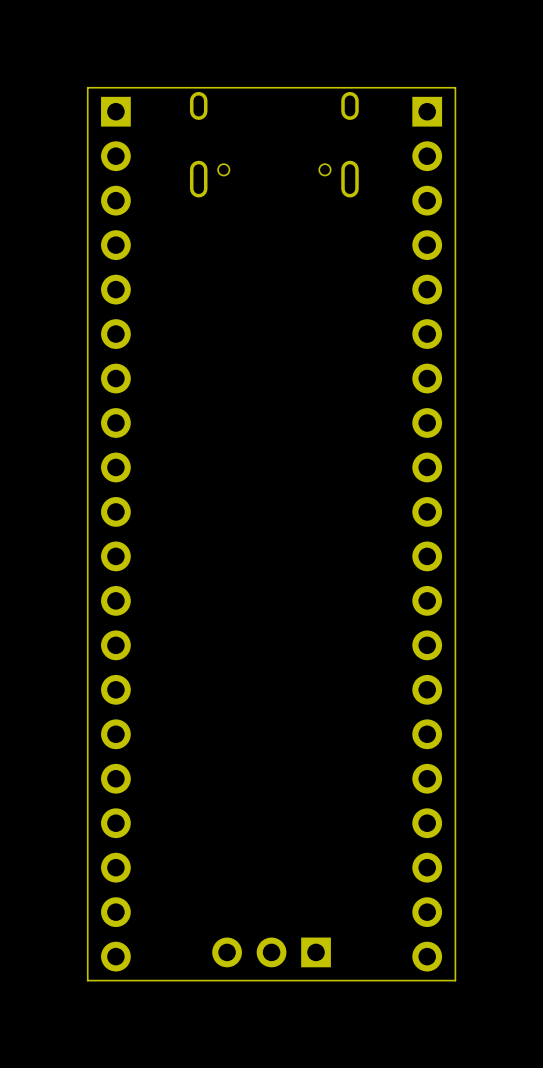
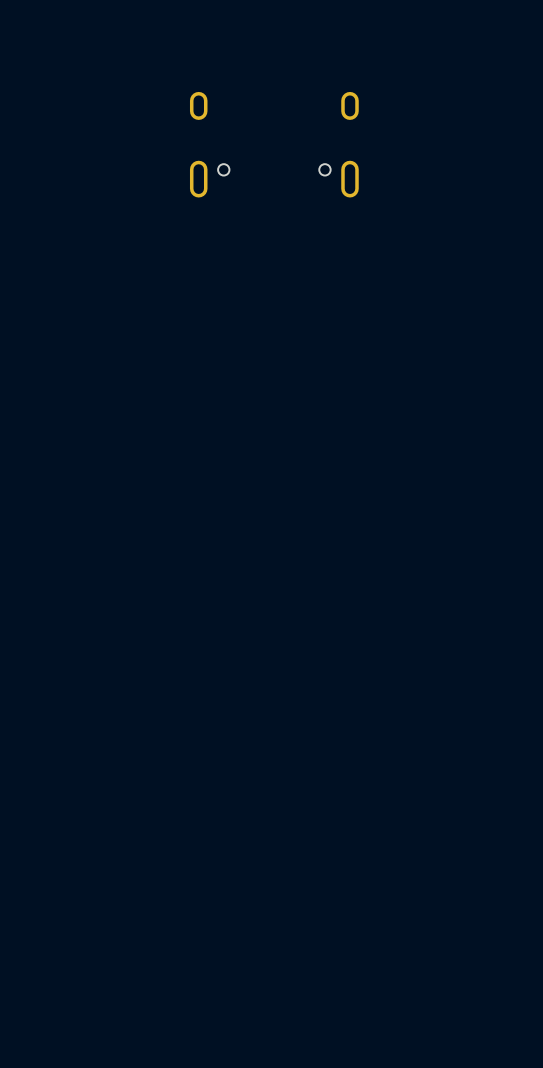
board edge: (455, 87) (87, 87) (87, 980) (455, 980) (455, 87) -> none
part: (115, 534) -> none
part: (427, 534) -> none
part: (271, 952) -> none

